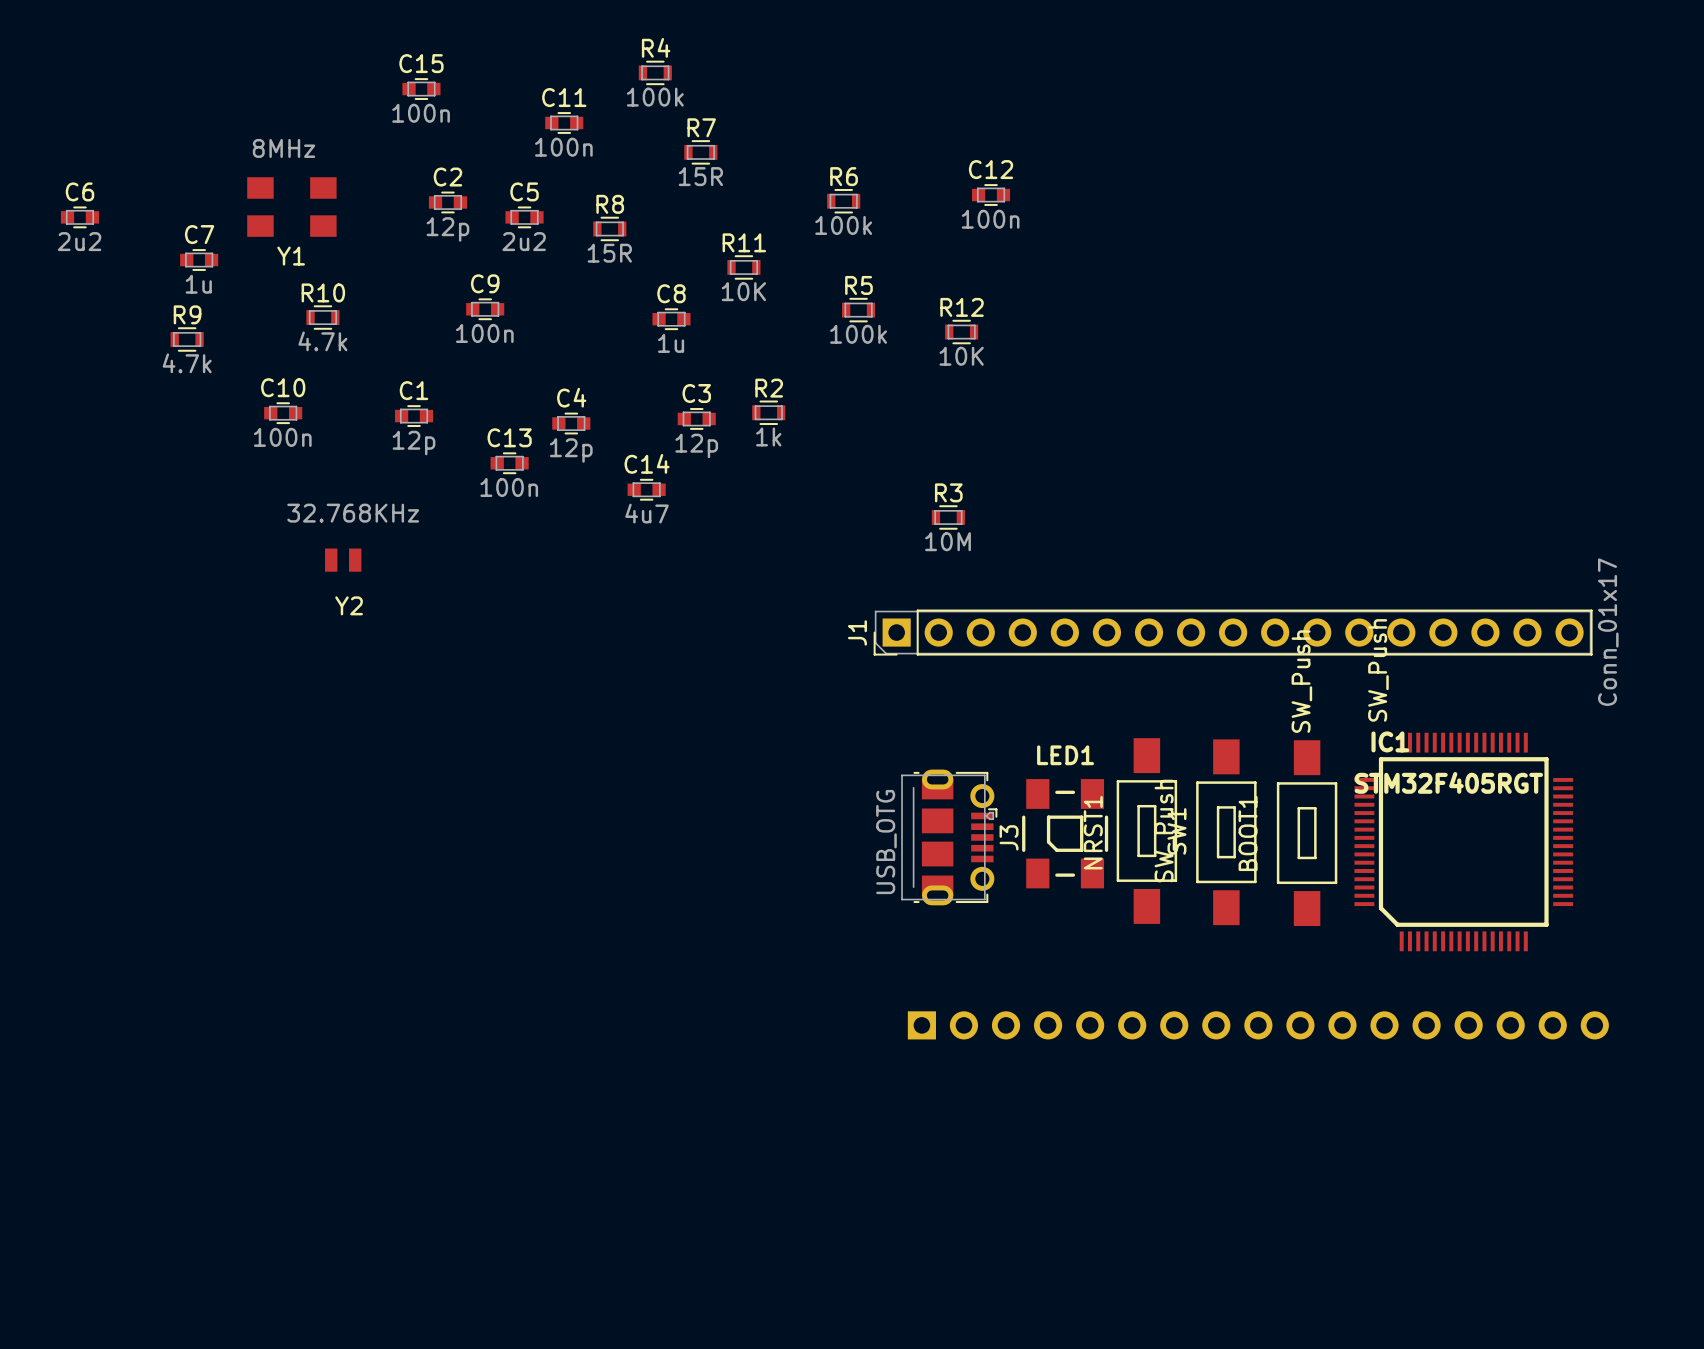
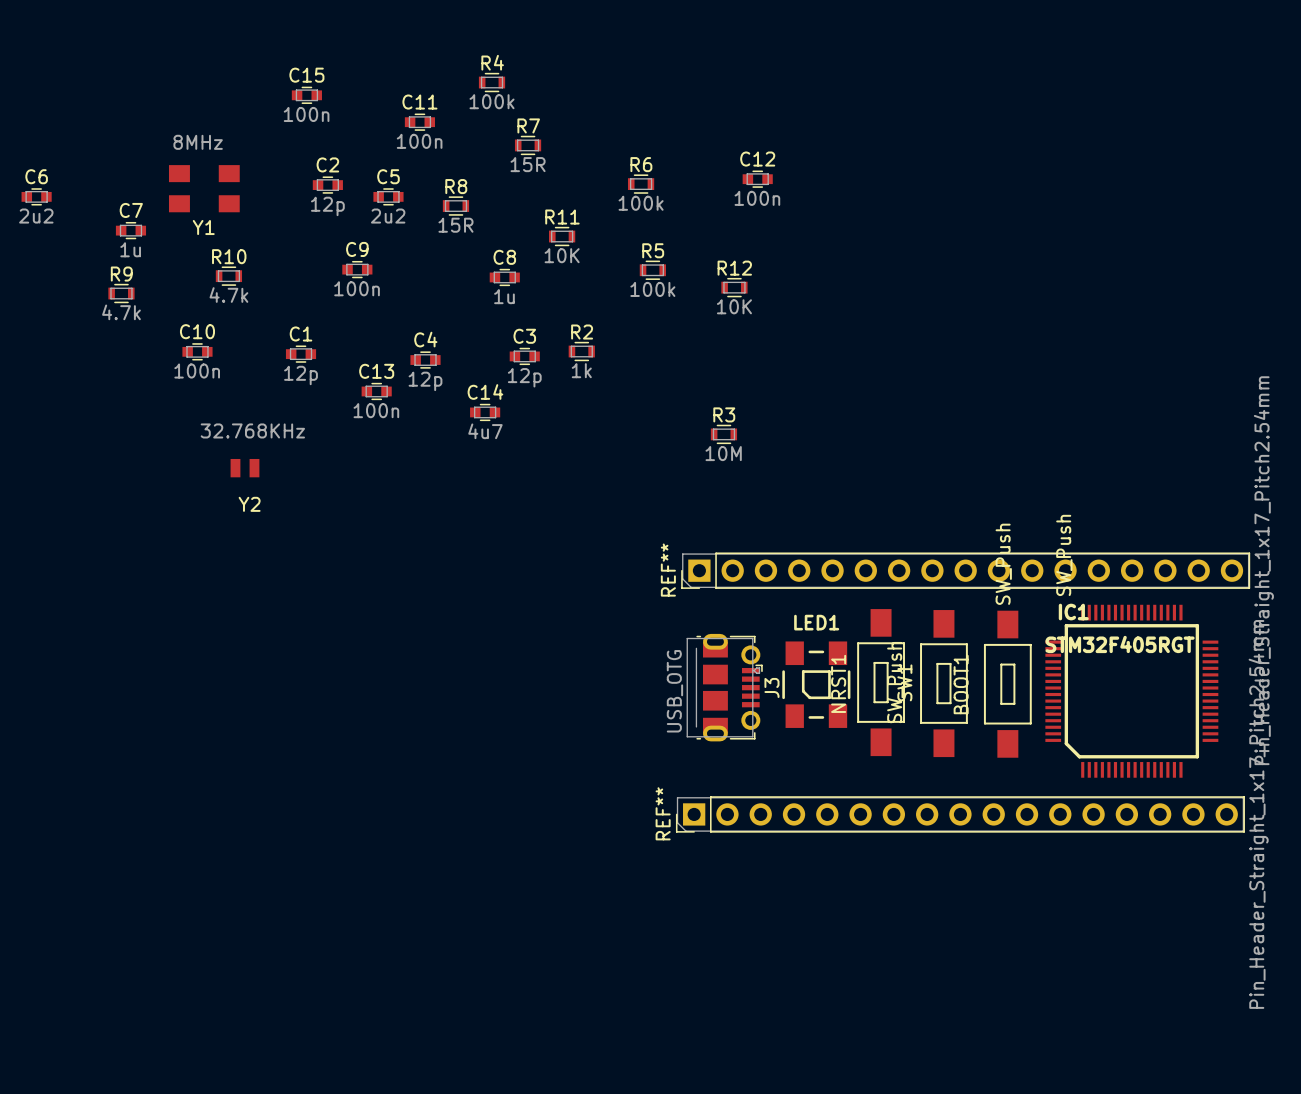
J1: Conn_01x17 (1233, 632) -> none
REF**: none -> Pin_Header_Straight_1x17_Pitch2.54mm (965, 570)
REF**: none -> Pin_Header_Straight_1x17_Pitch2.54mm (960, 814)
part: (1258, 1025) -> none

